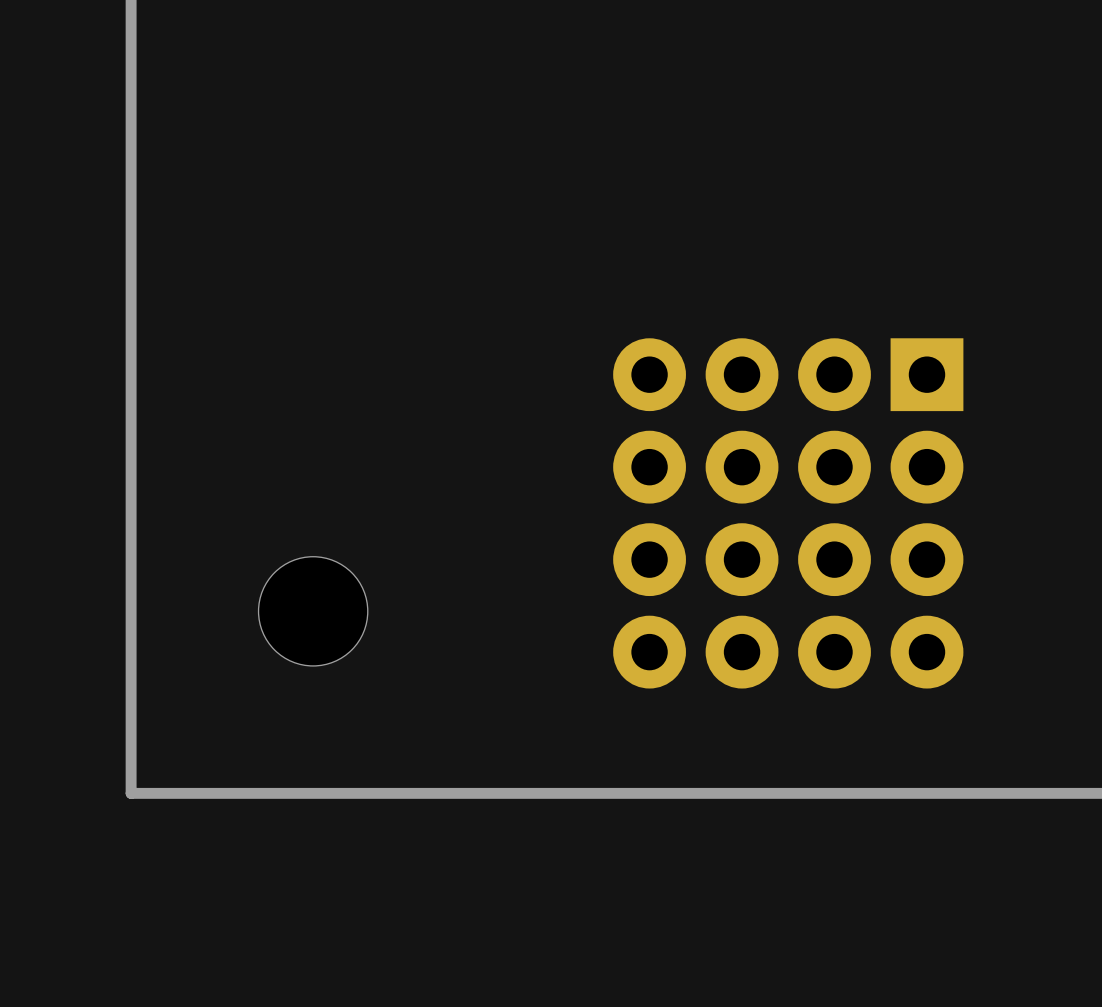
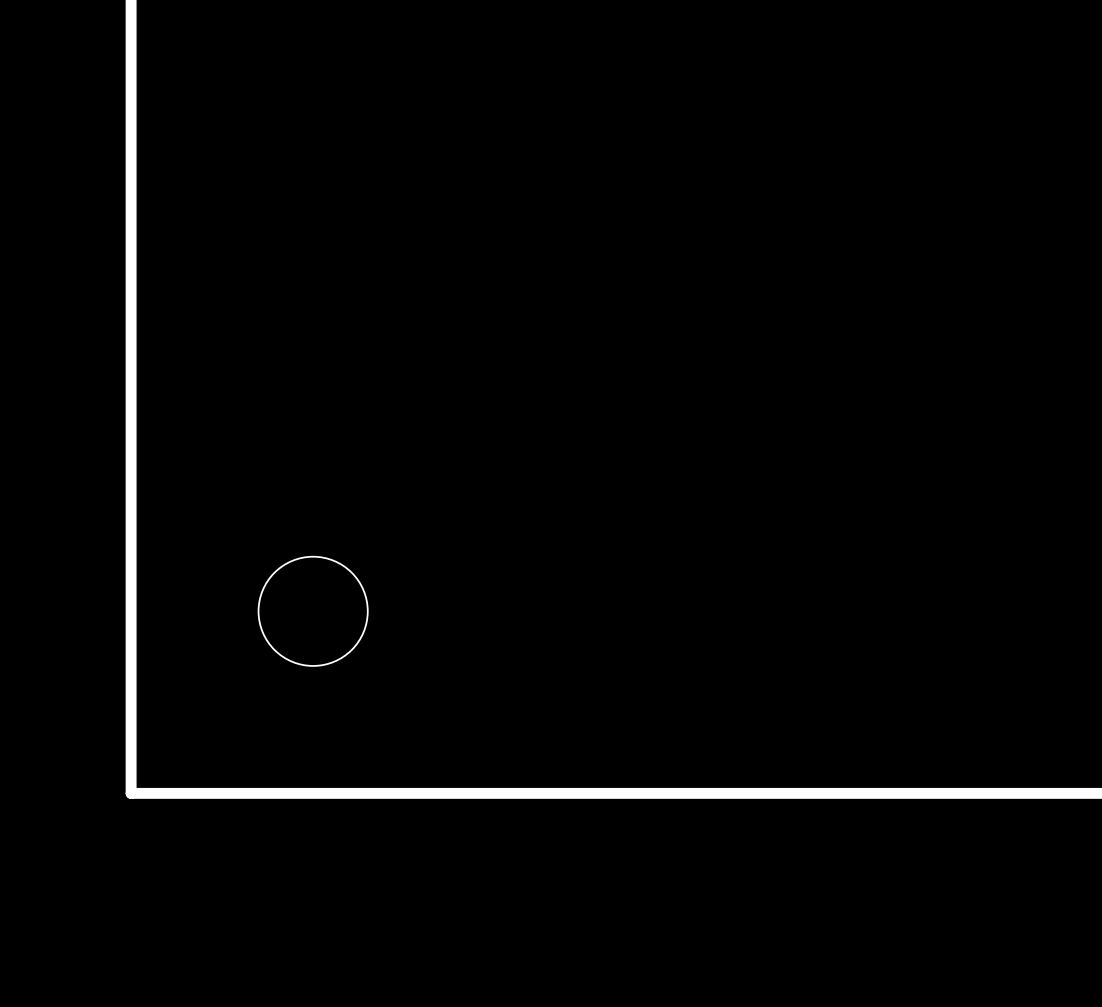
part: (788, 513) -> none

